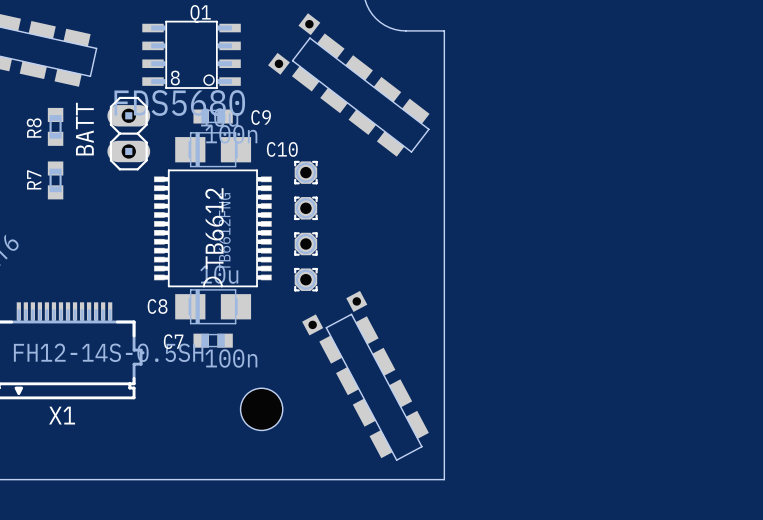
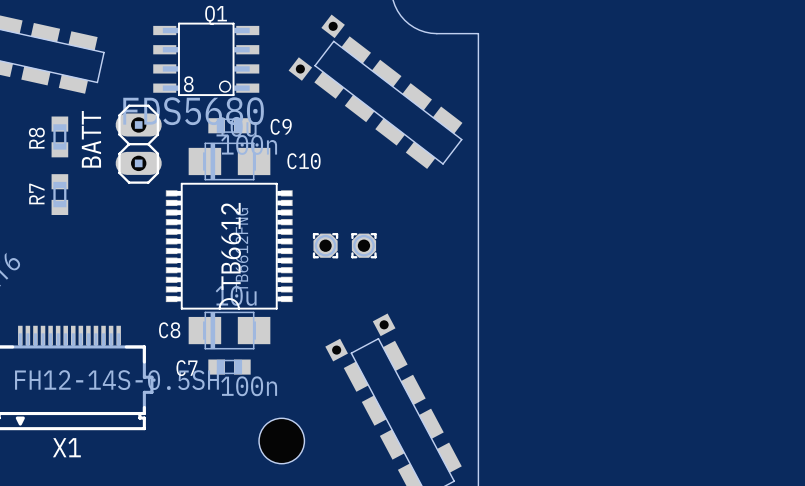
part: (305, 172) -> none
part: (305, 208) -> none
part: none -> (325, 245)
part: none -> (363, 245)
part: (305, 244) -> none
part: (305, 279) -> none

